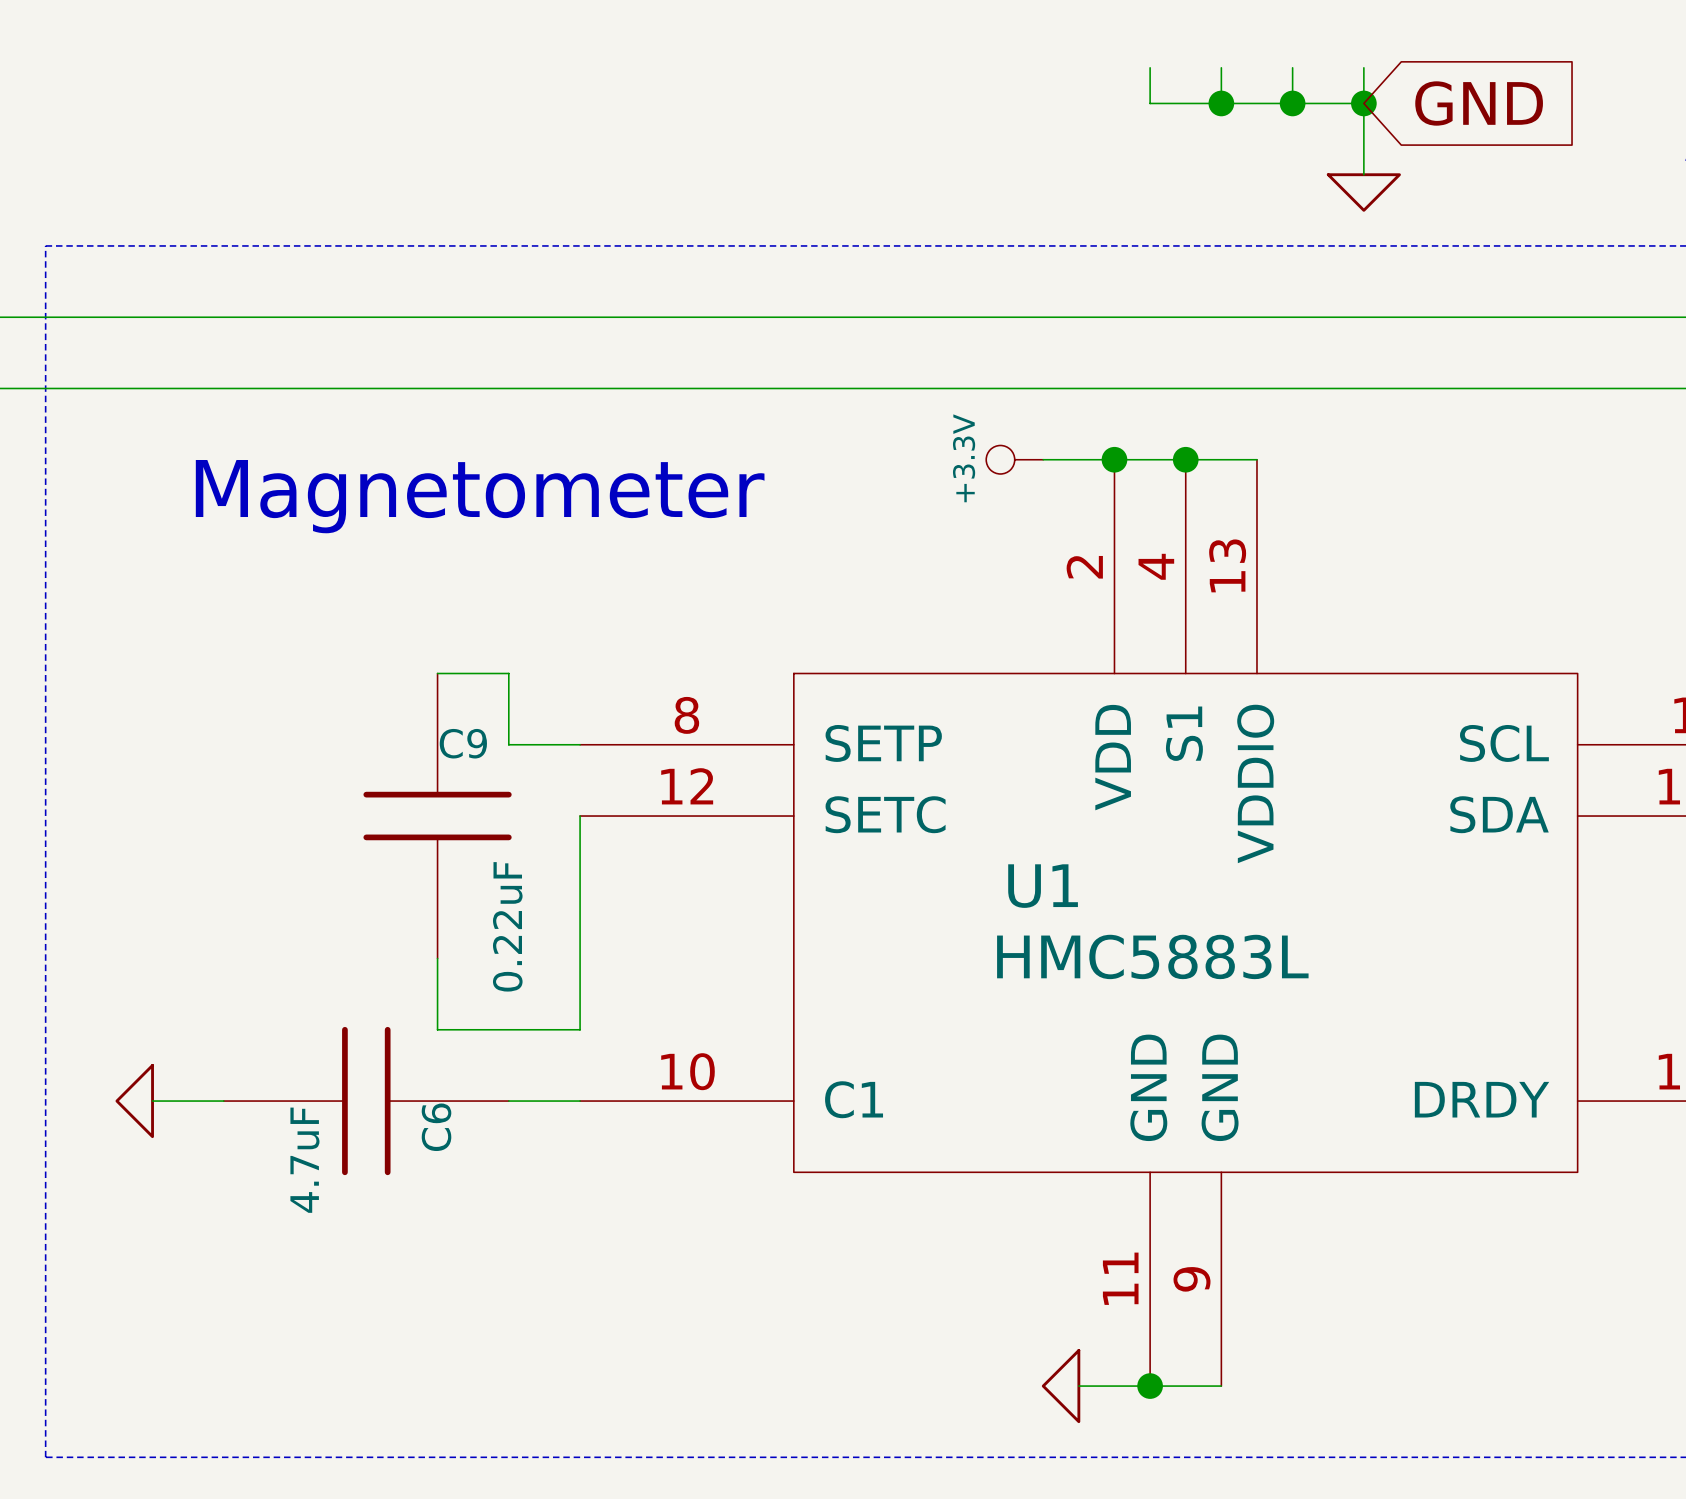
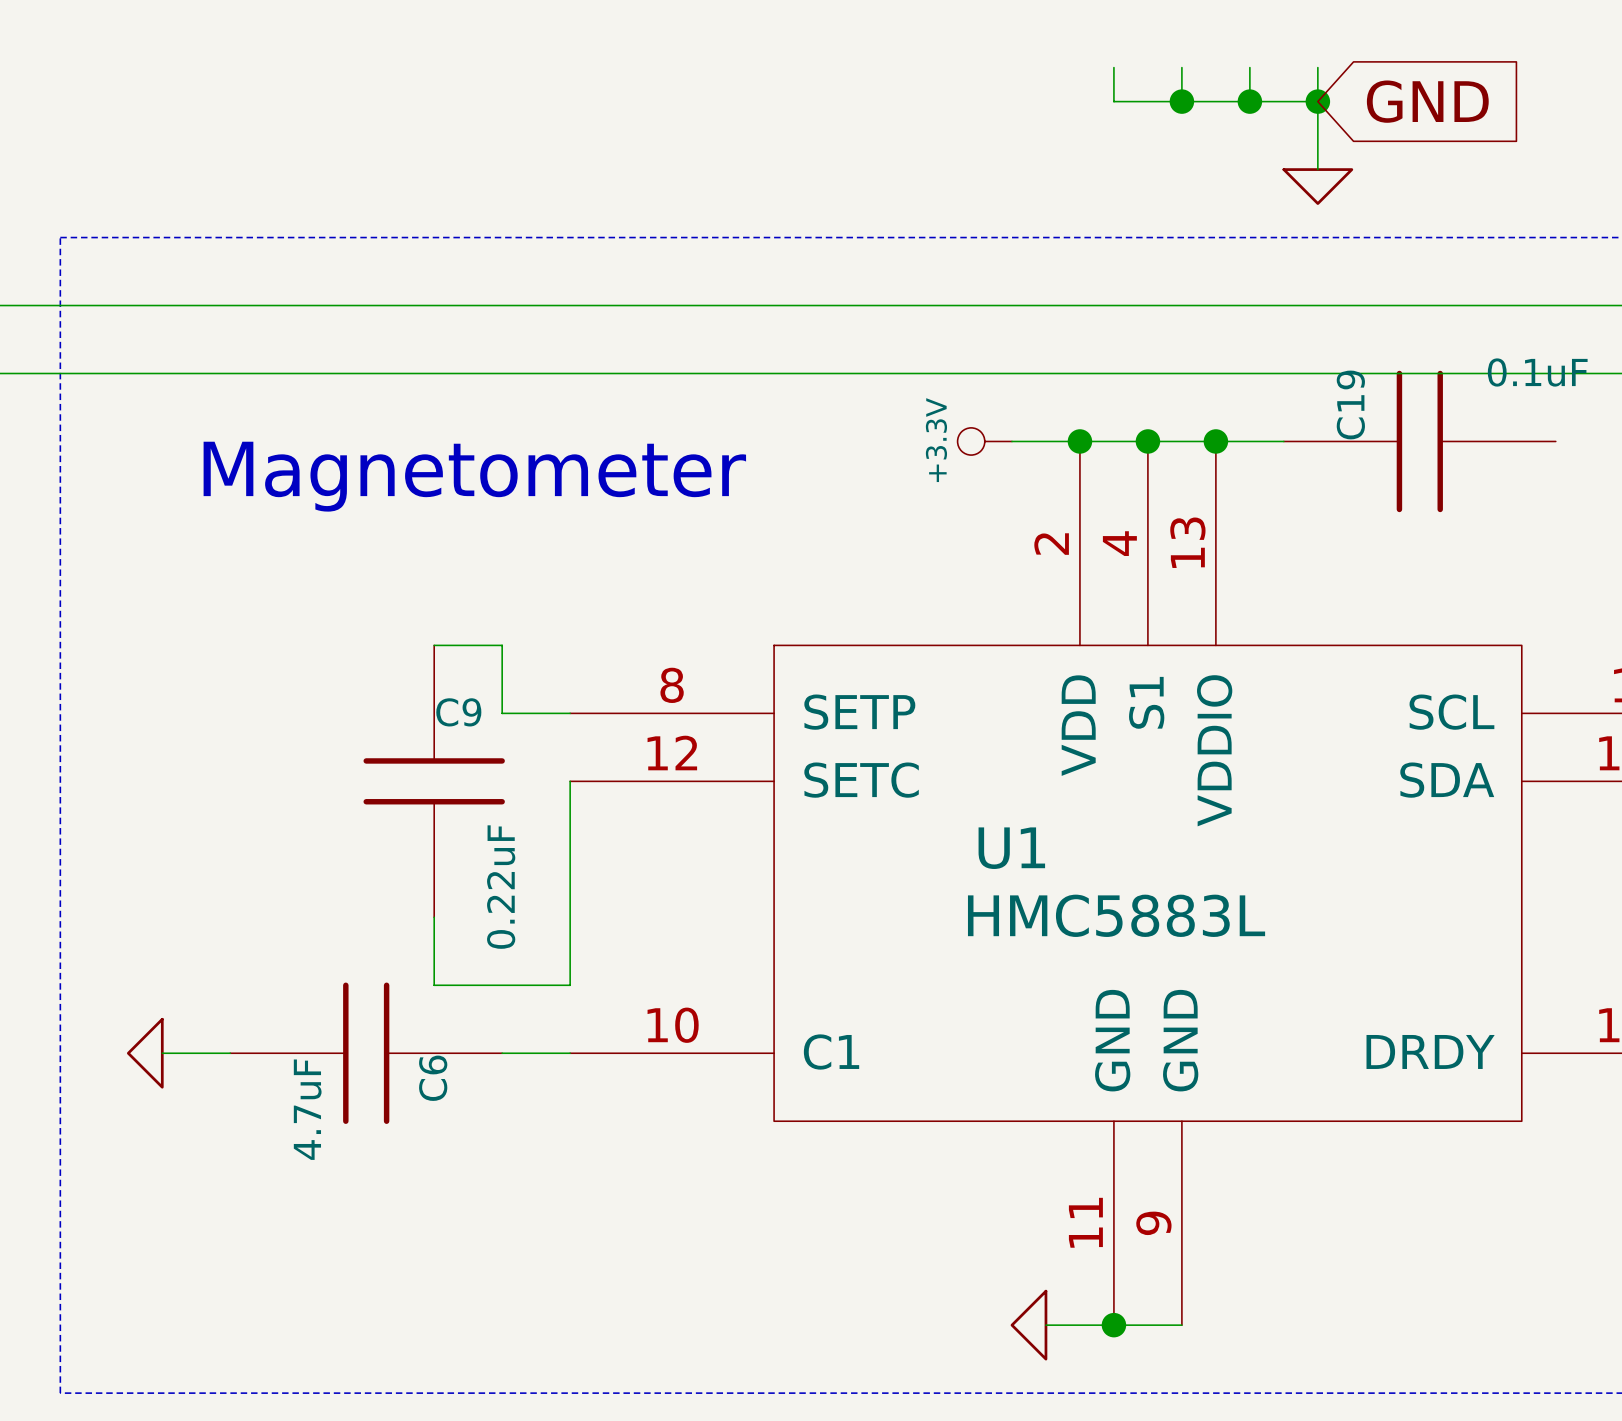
wire: none -> (1215, 441) (1283, 441)
junction: none -> (1215, 441)
C19: none -> 0.1uF (1419, 441)

